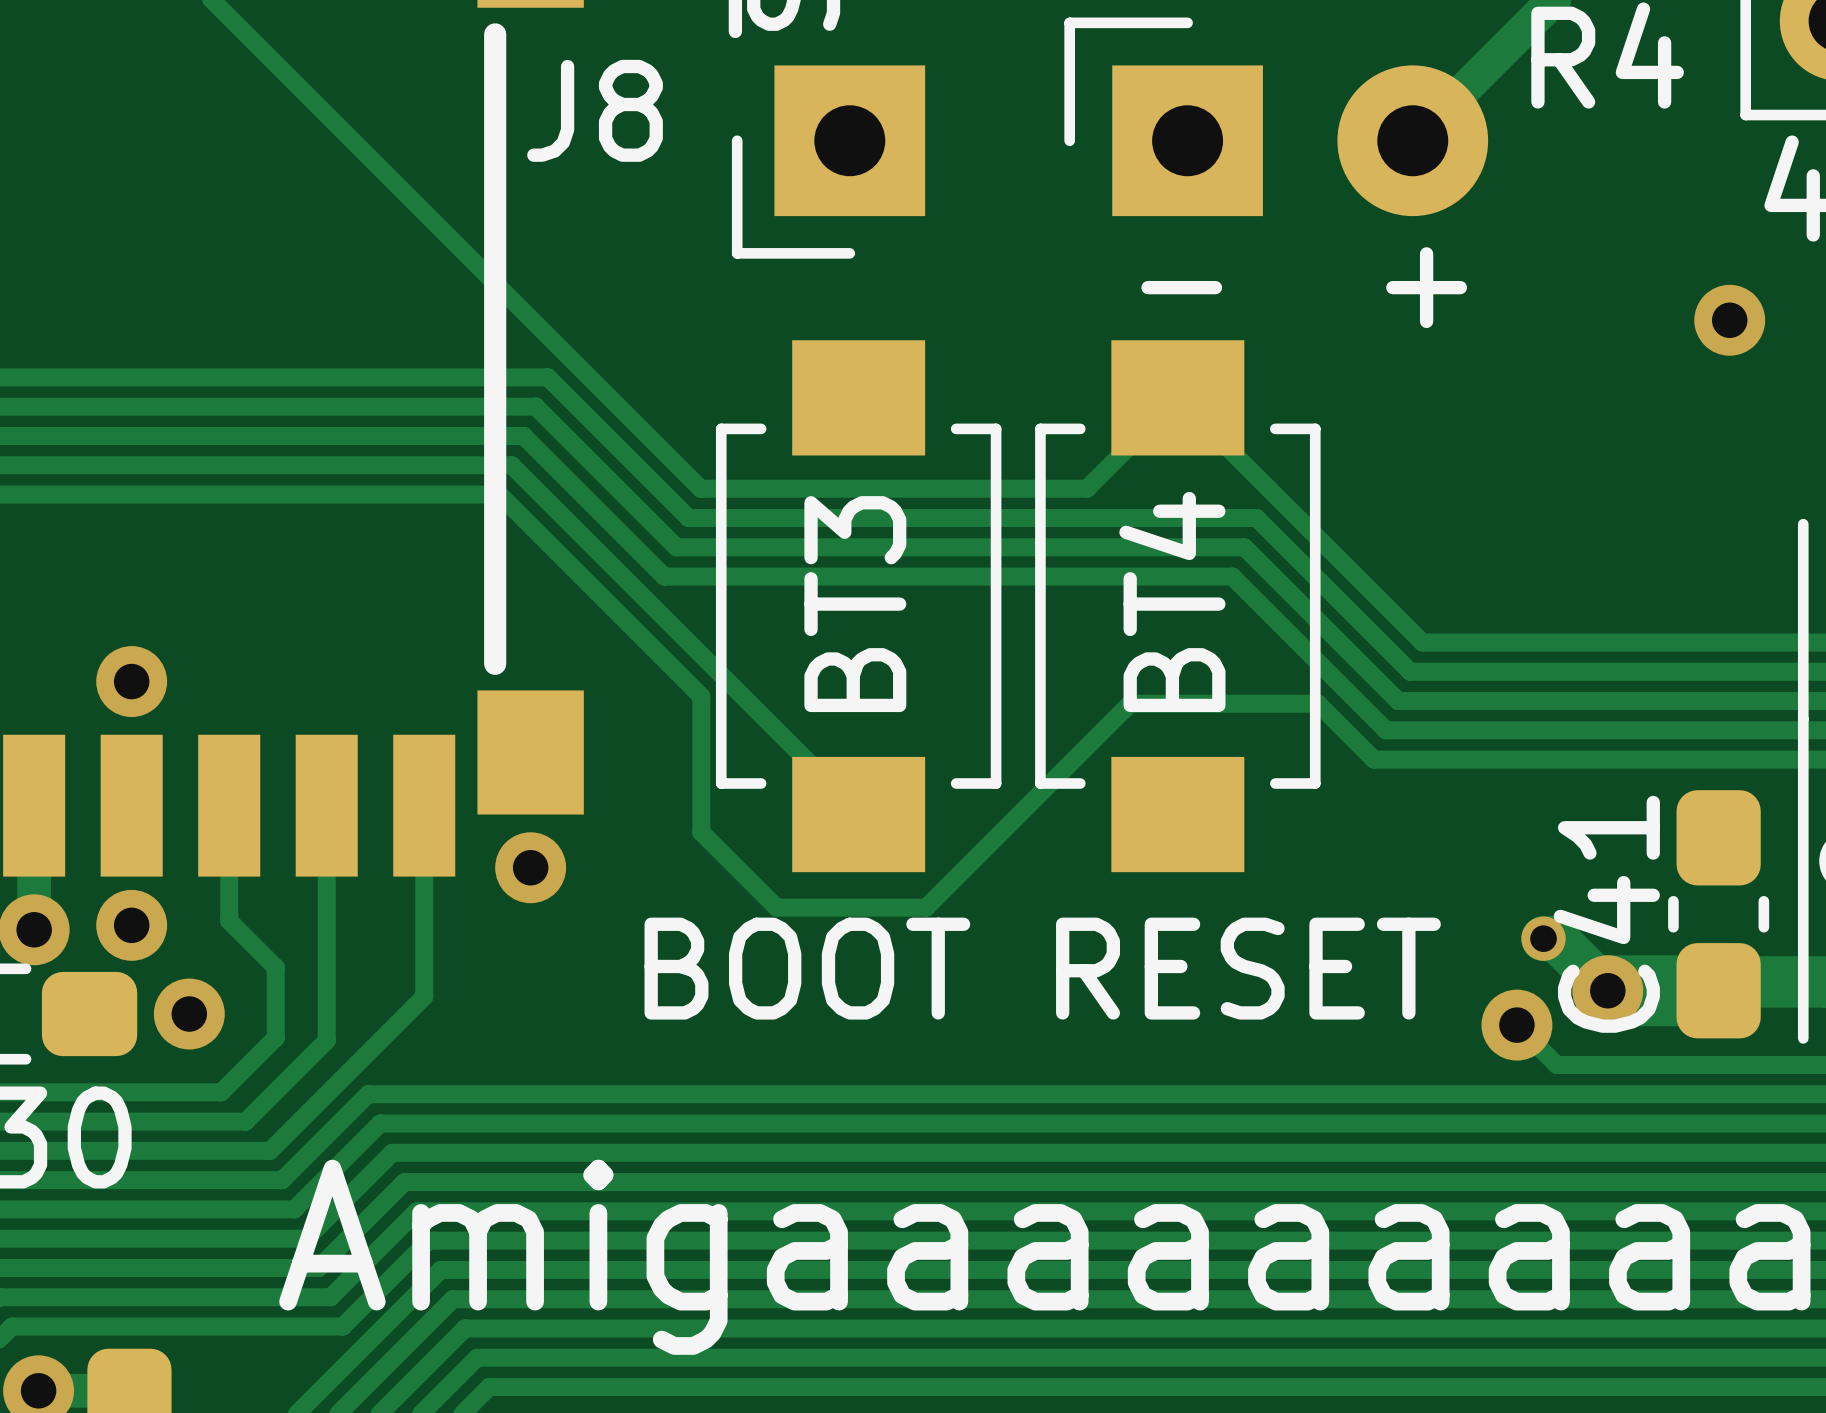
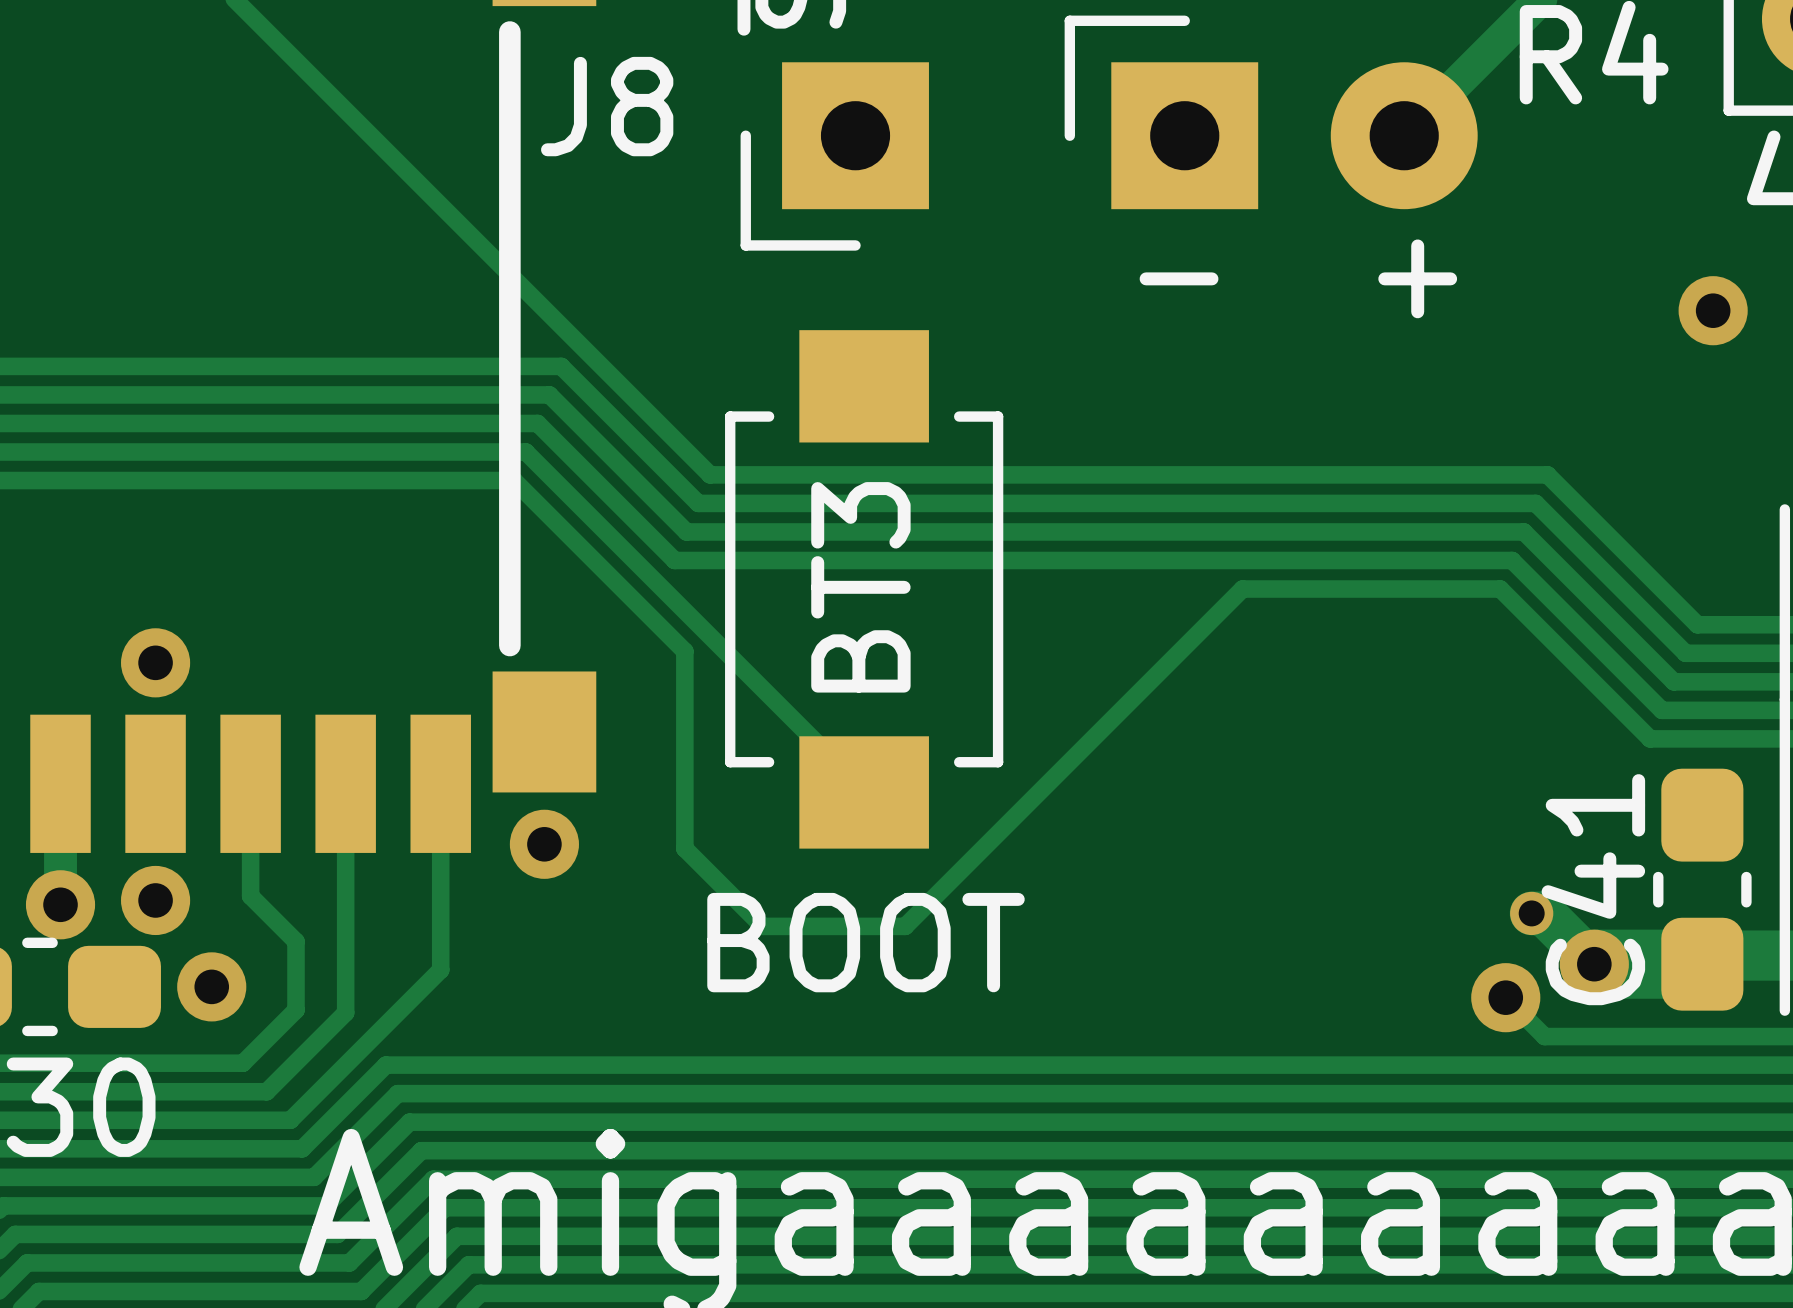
track: (1086, 488) (1177, 397) (1422, 642) (1713, 642) -> (1086, 474) (1547, 474) (1697, 624)
track: (1256, 518) (1410, 671) (1701, 671) -> (1251, 503) (1535, 503) (1685, 653)
track: (1244, 547) (1398, 701) (1689, 701) -> (1240, 531) (1523, 531) (1673, 681)
track: (1232, 576) (1386, 730) (1677, 730) -> (1228, 560) (1512, 560) (1662, 710)
BT4: (1177, 606) -> none
track: (674, 669) (701, 696) (701, 832) (776, 907) (926, 907) (1130, 703) (1318, 703) (1373, 759) (1665, 759) -> (684, 651) (684, 848) (762, 926) (905, 926) (1242, 589) (1500, 589) (1650, 738)
text position: BOOT (807, 968) -> BOOT (866, 942)
text: RESET (1248, 968) -> none

